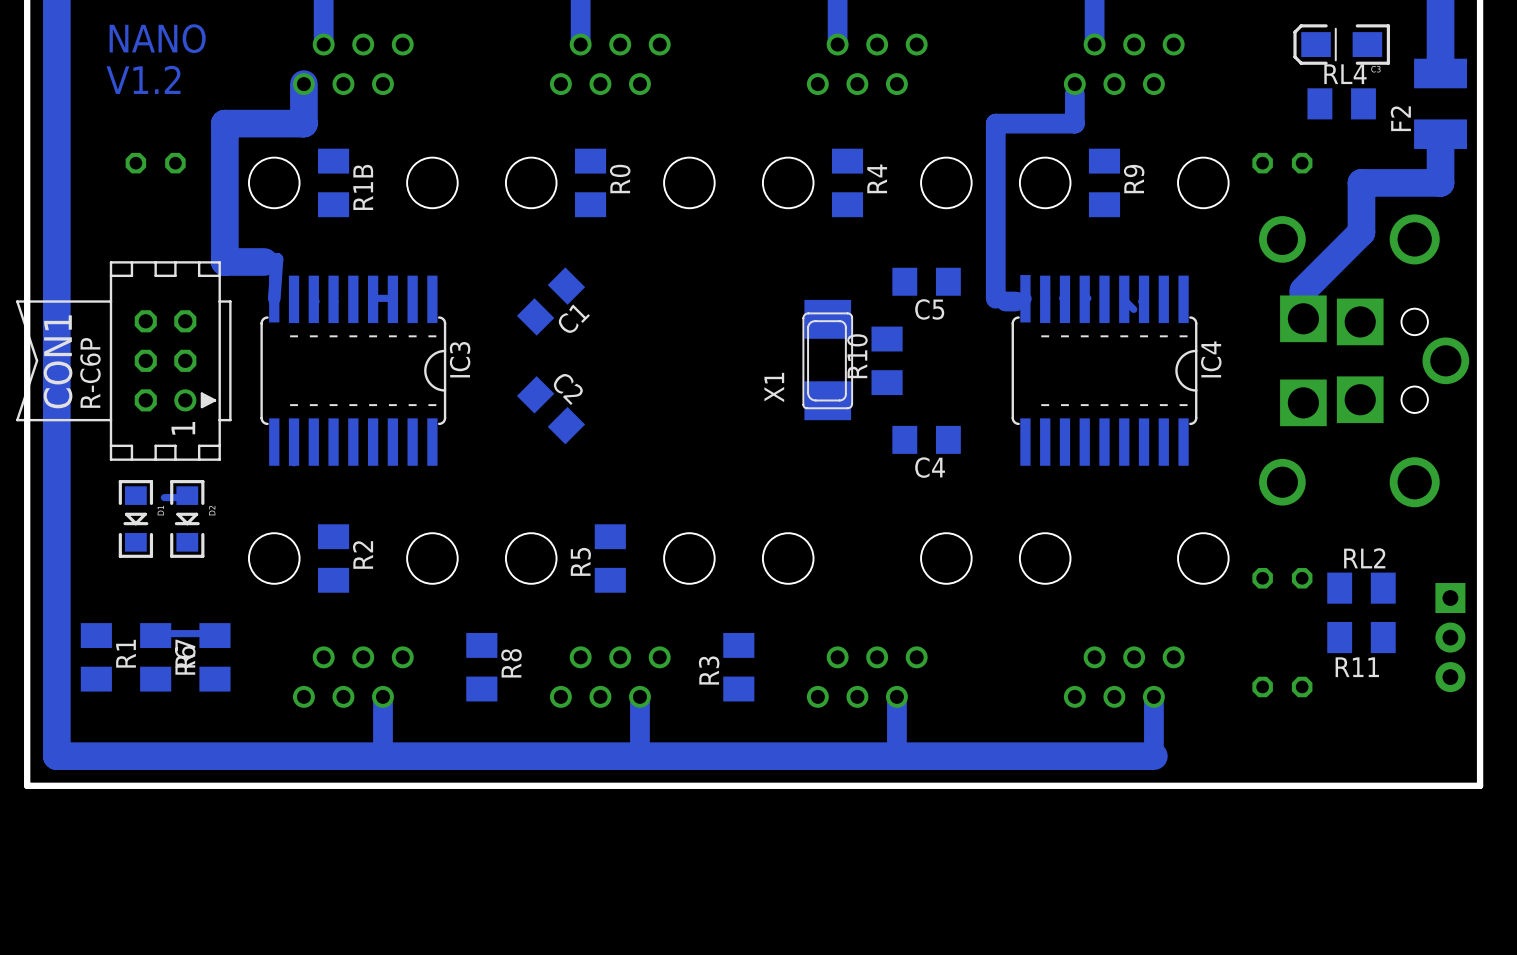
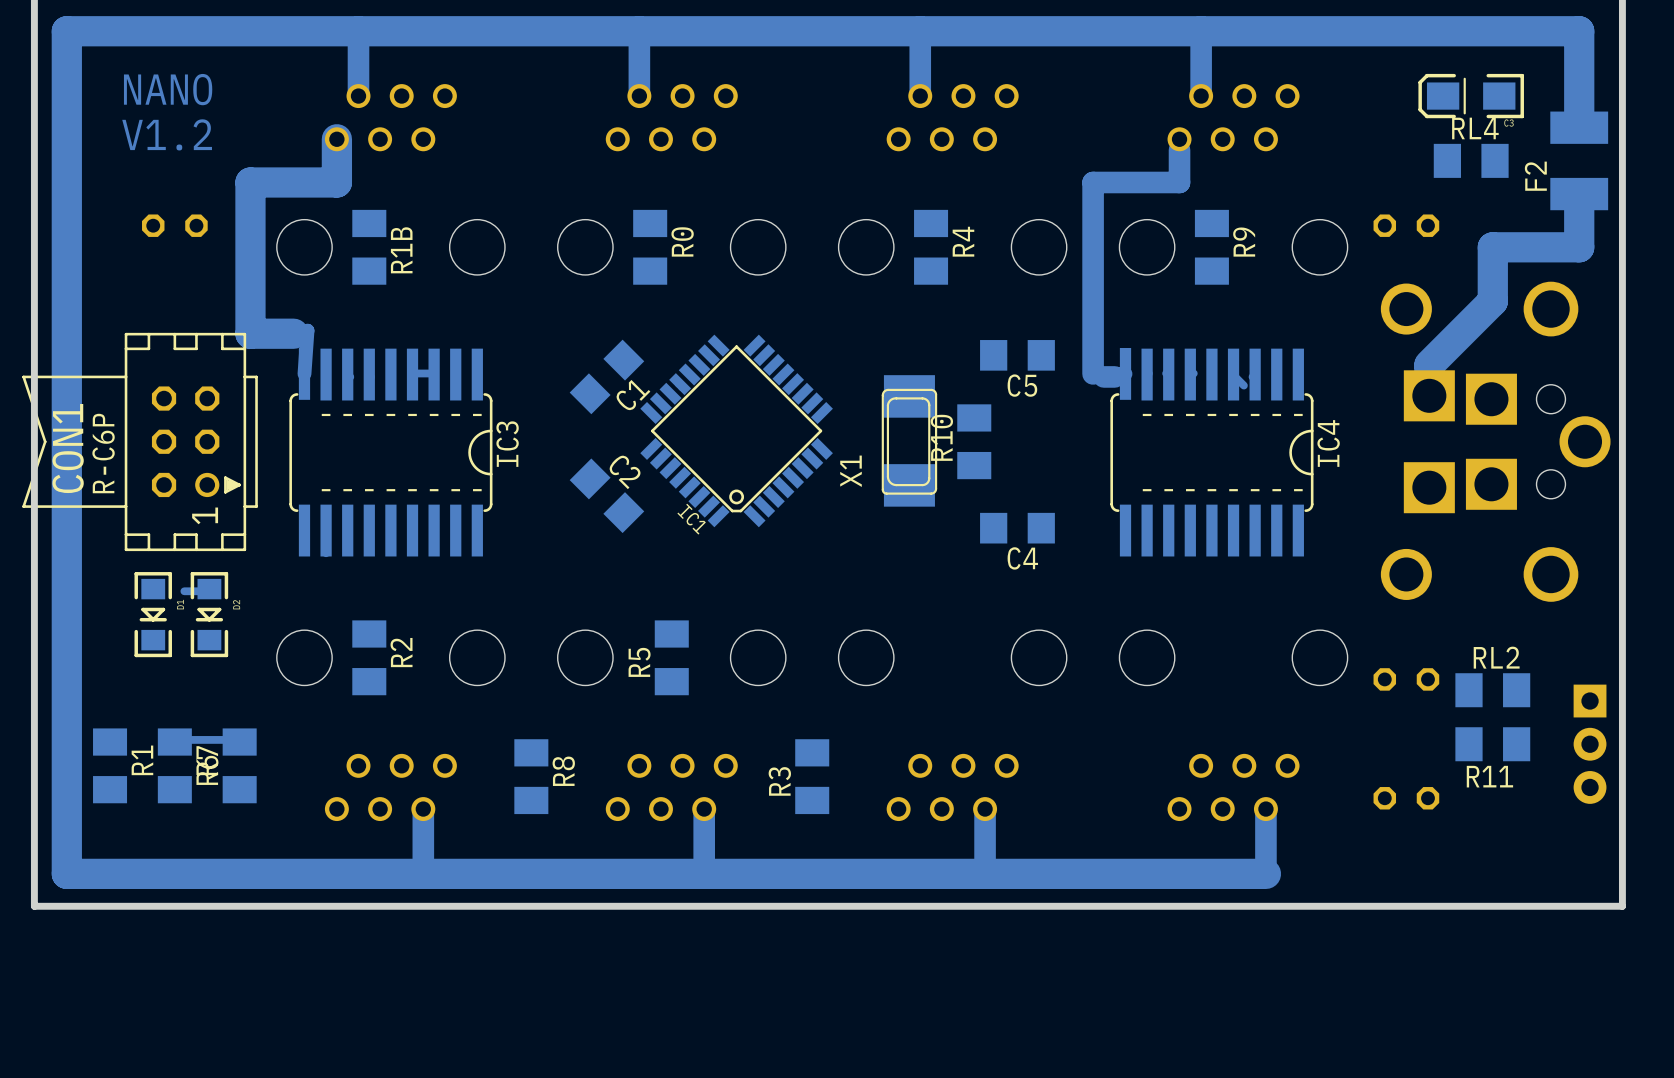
IC1: none -> (736, 430)

